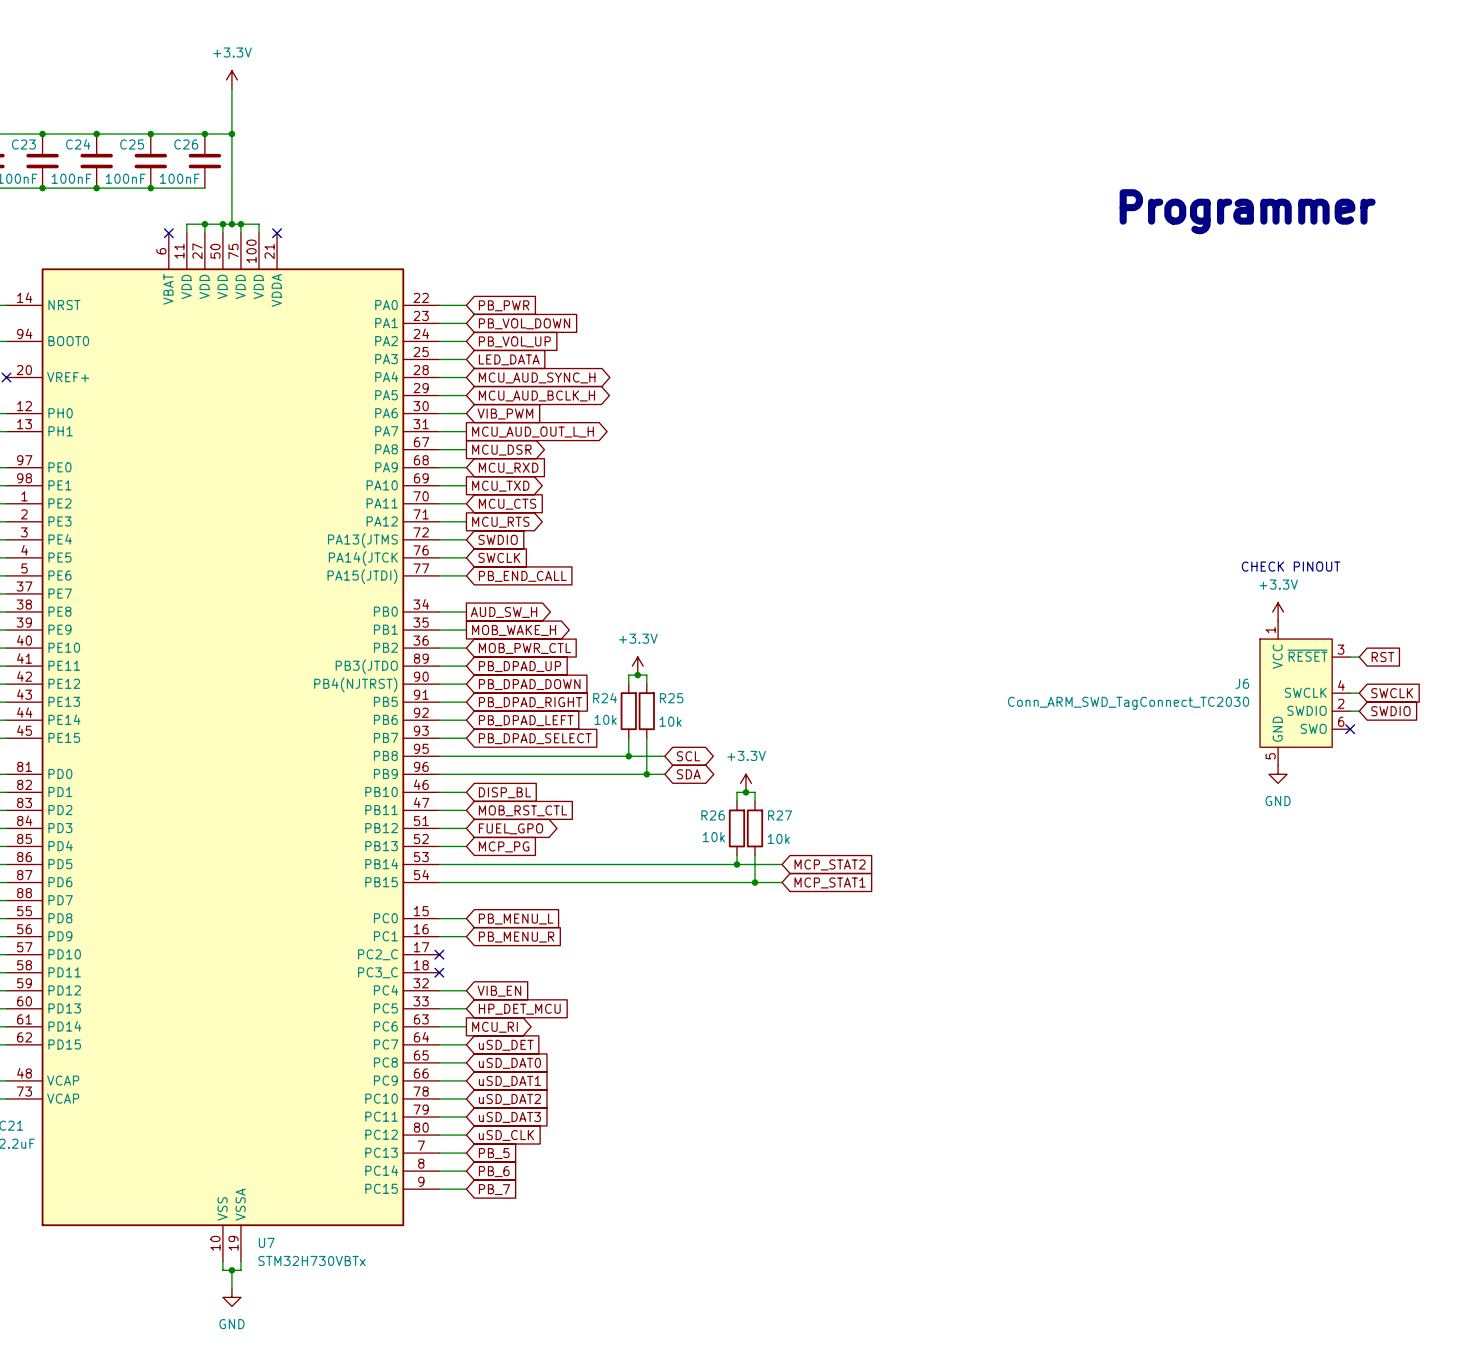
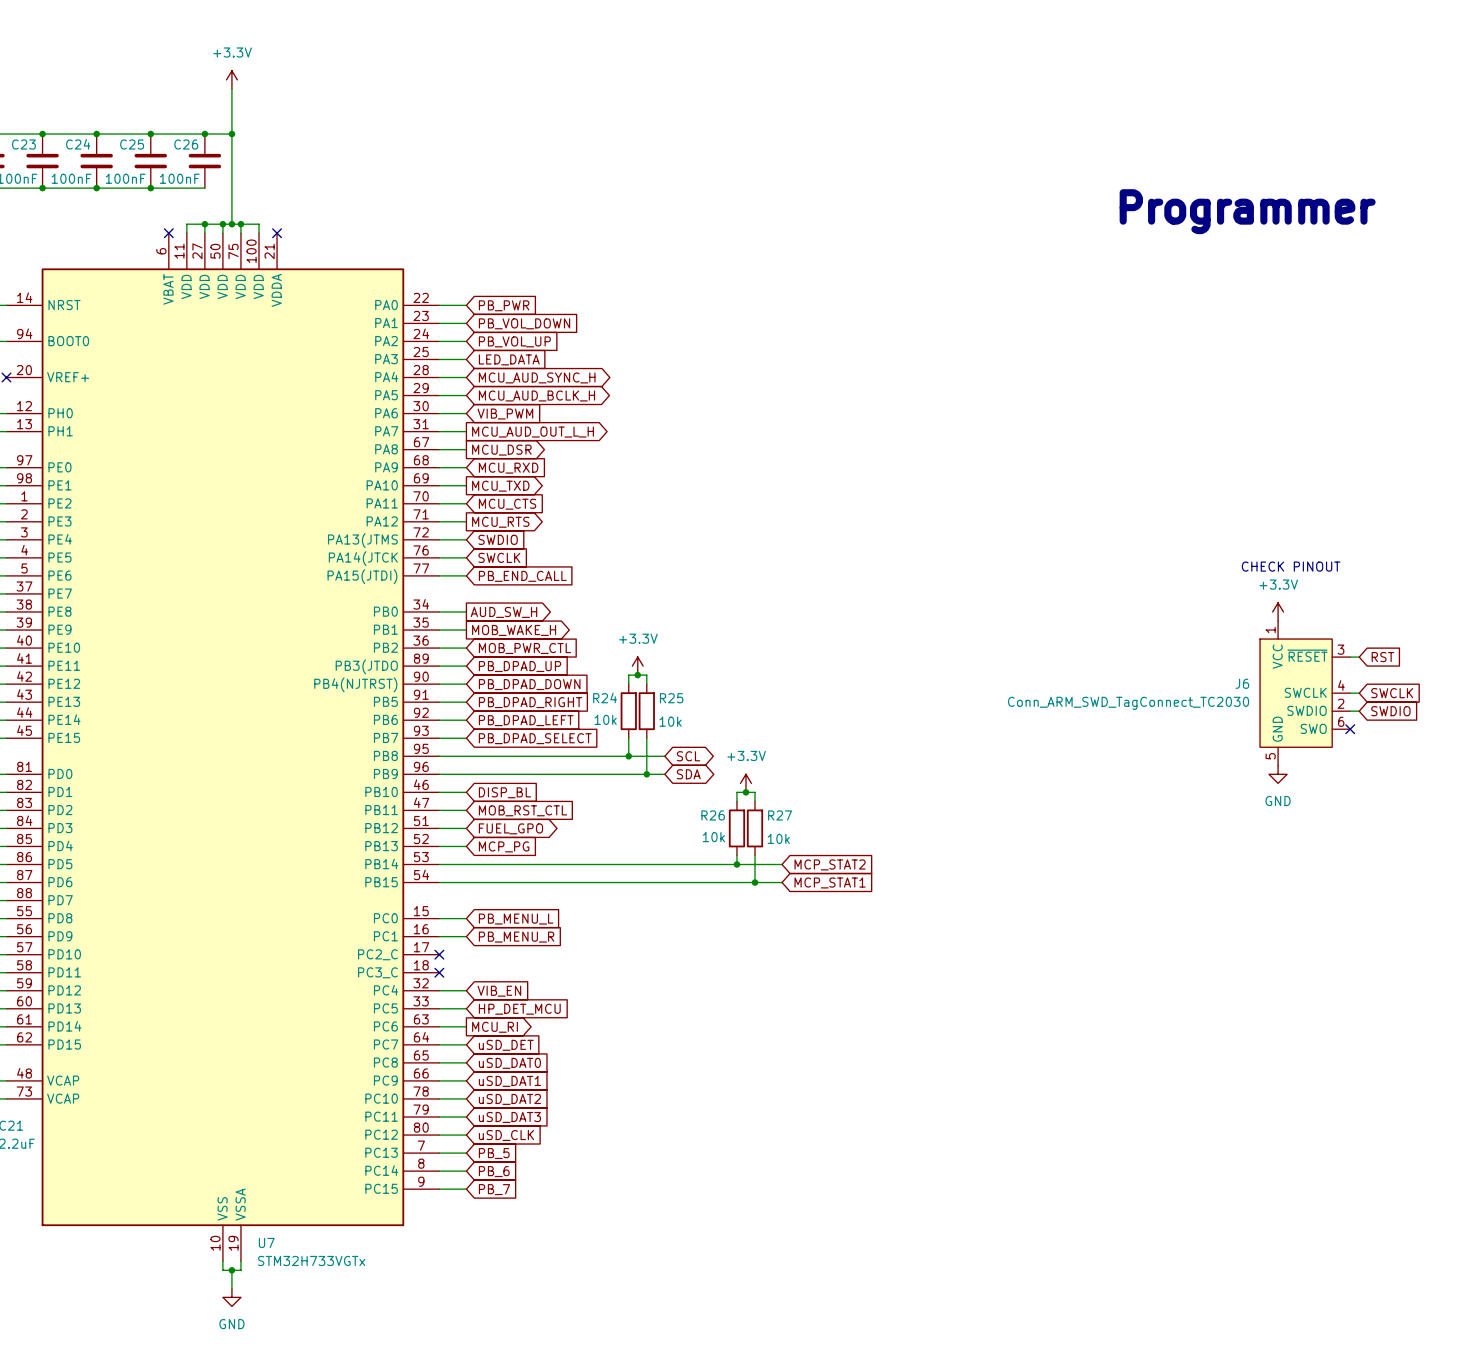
U7 value: STM32H730VBTx (312, 1260) -> STM32H733VGTx (311, 1260)

